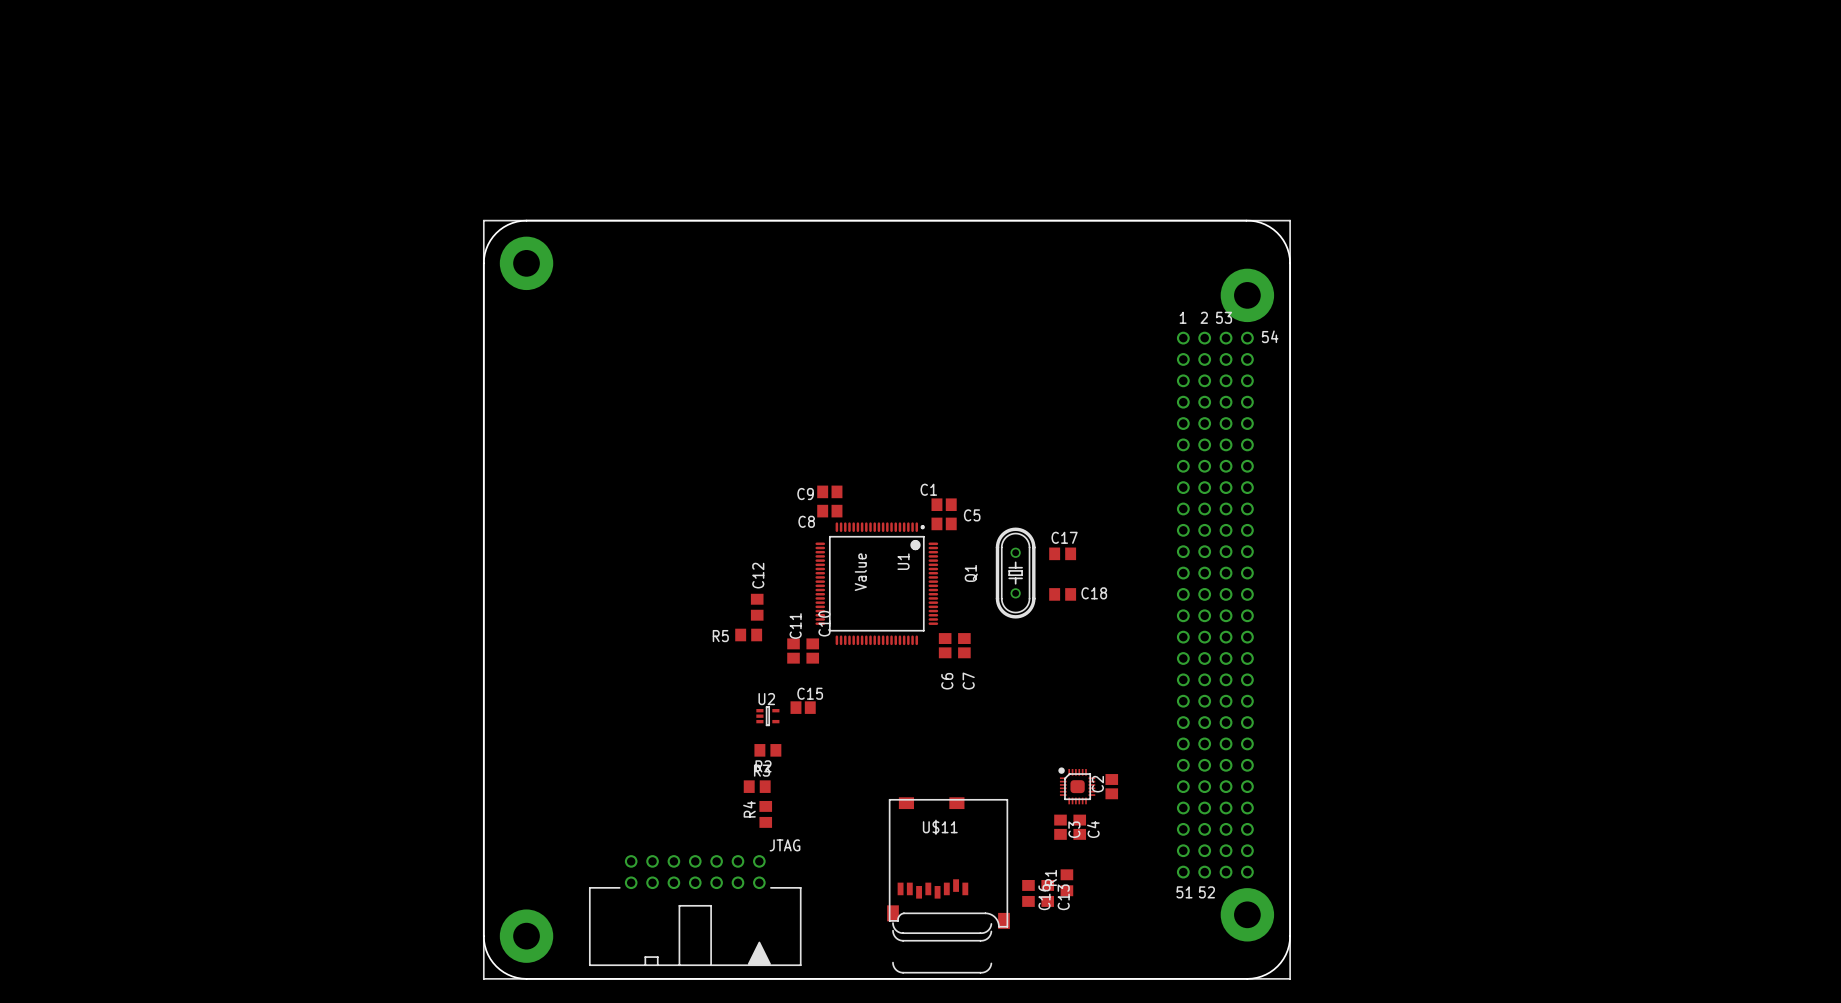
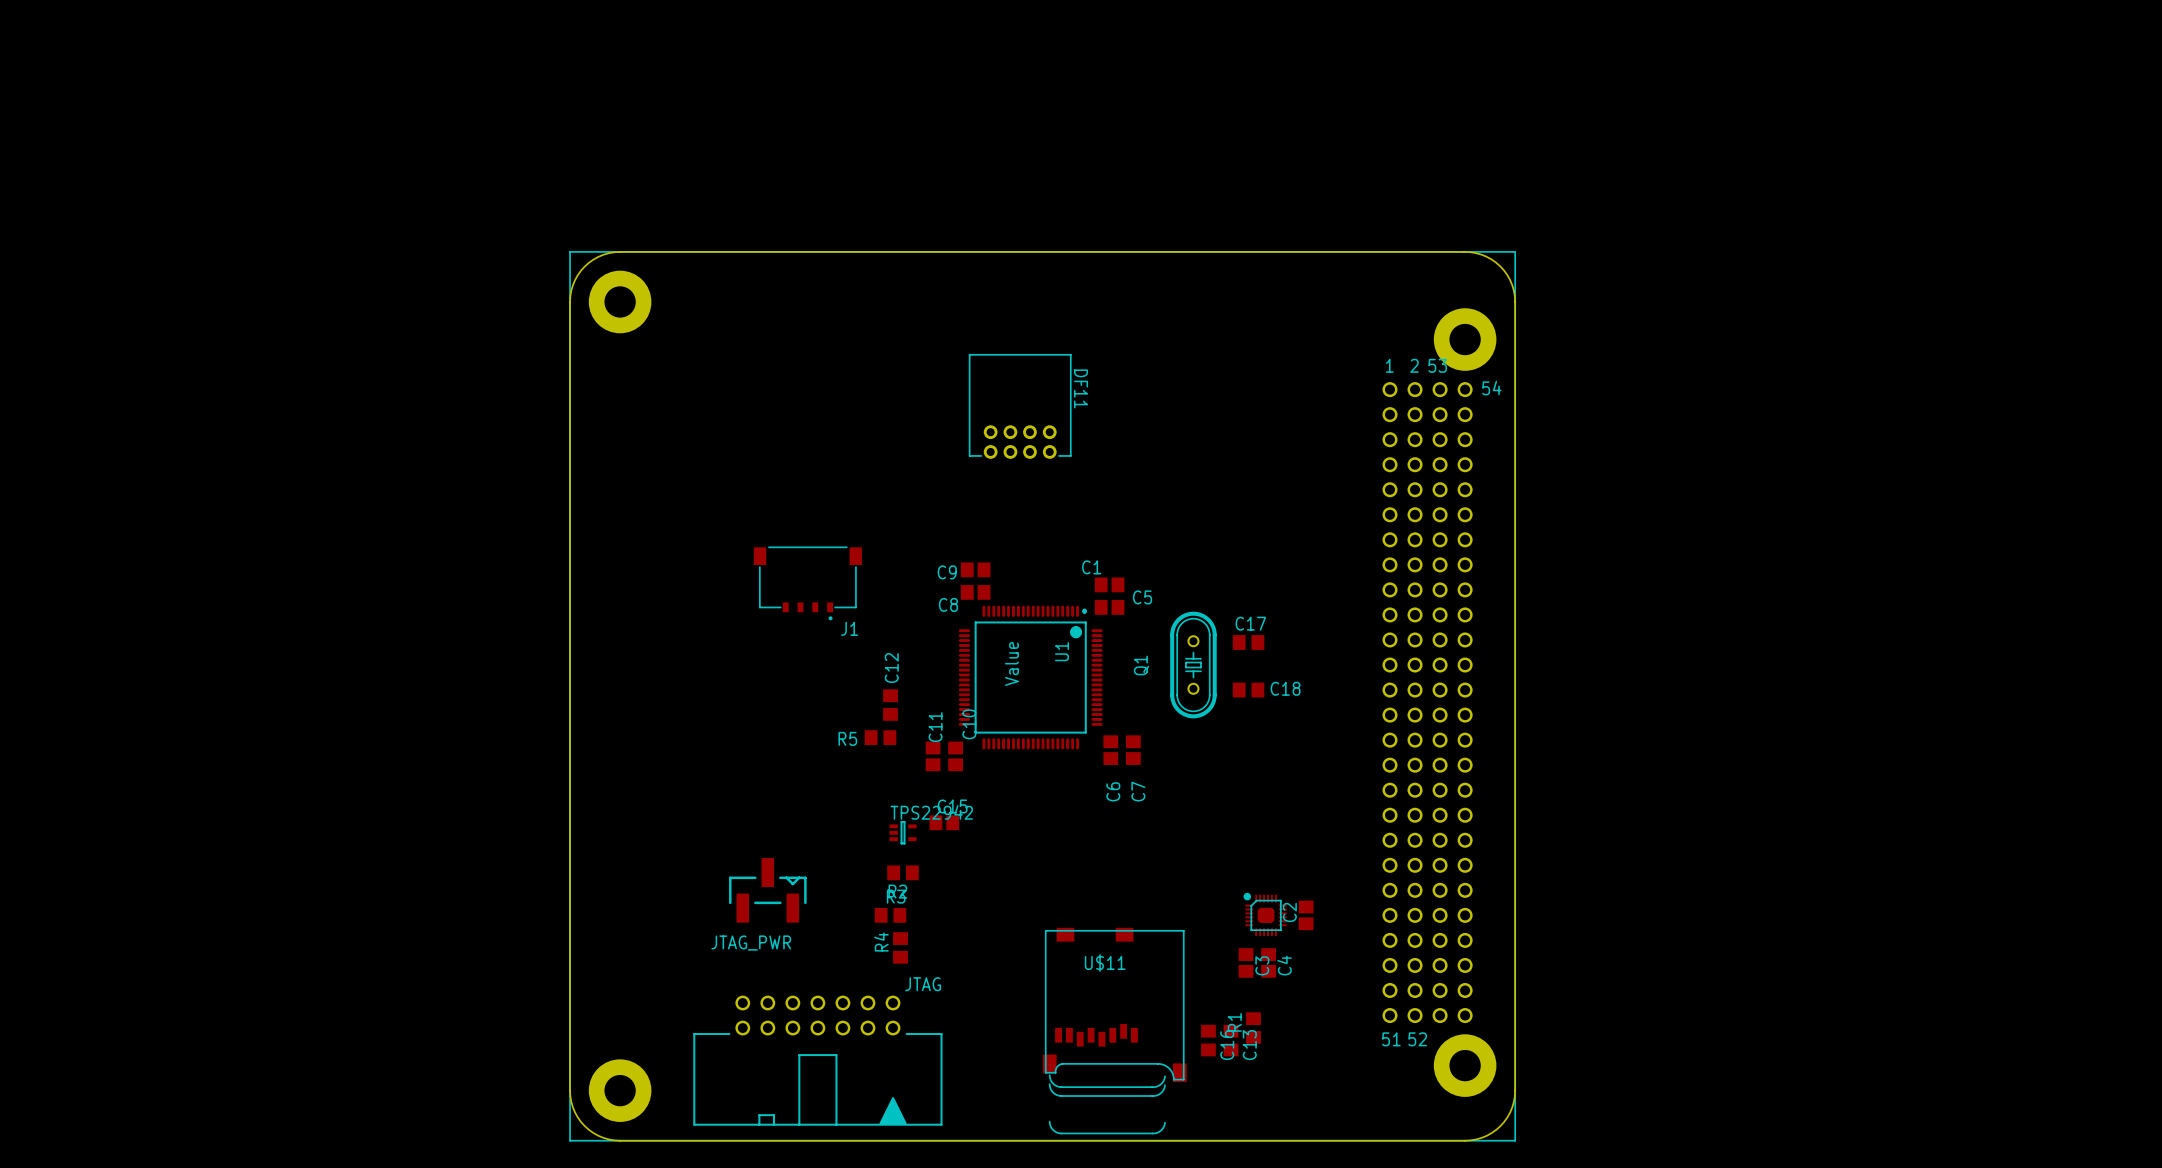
DF11: none -> (1020, 406)
J1: none -> (807, 583)
U2 name: U2 (766, 699) -> TPS22942 (931, 812)
JTAG_PWR: none -> (767, 890)

